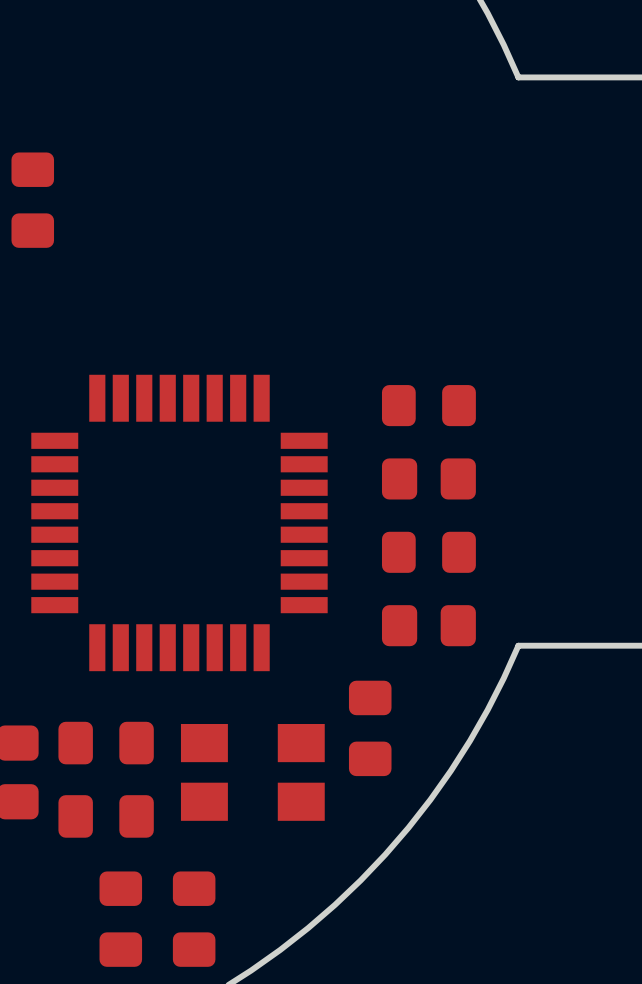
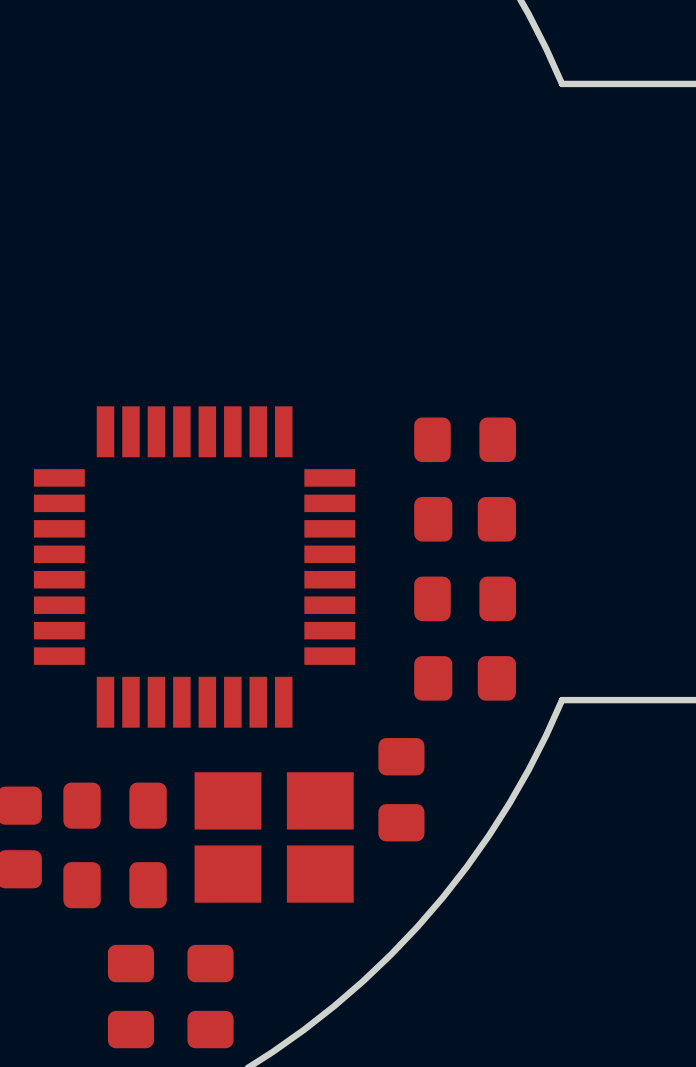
part: (32, 200) -> none
part footprint: [180, 723, 325, 821] -> [194, 772, 354, 903]

